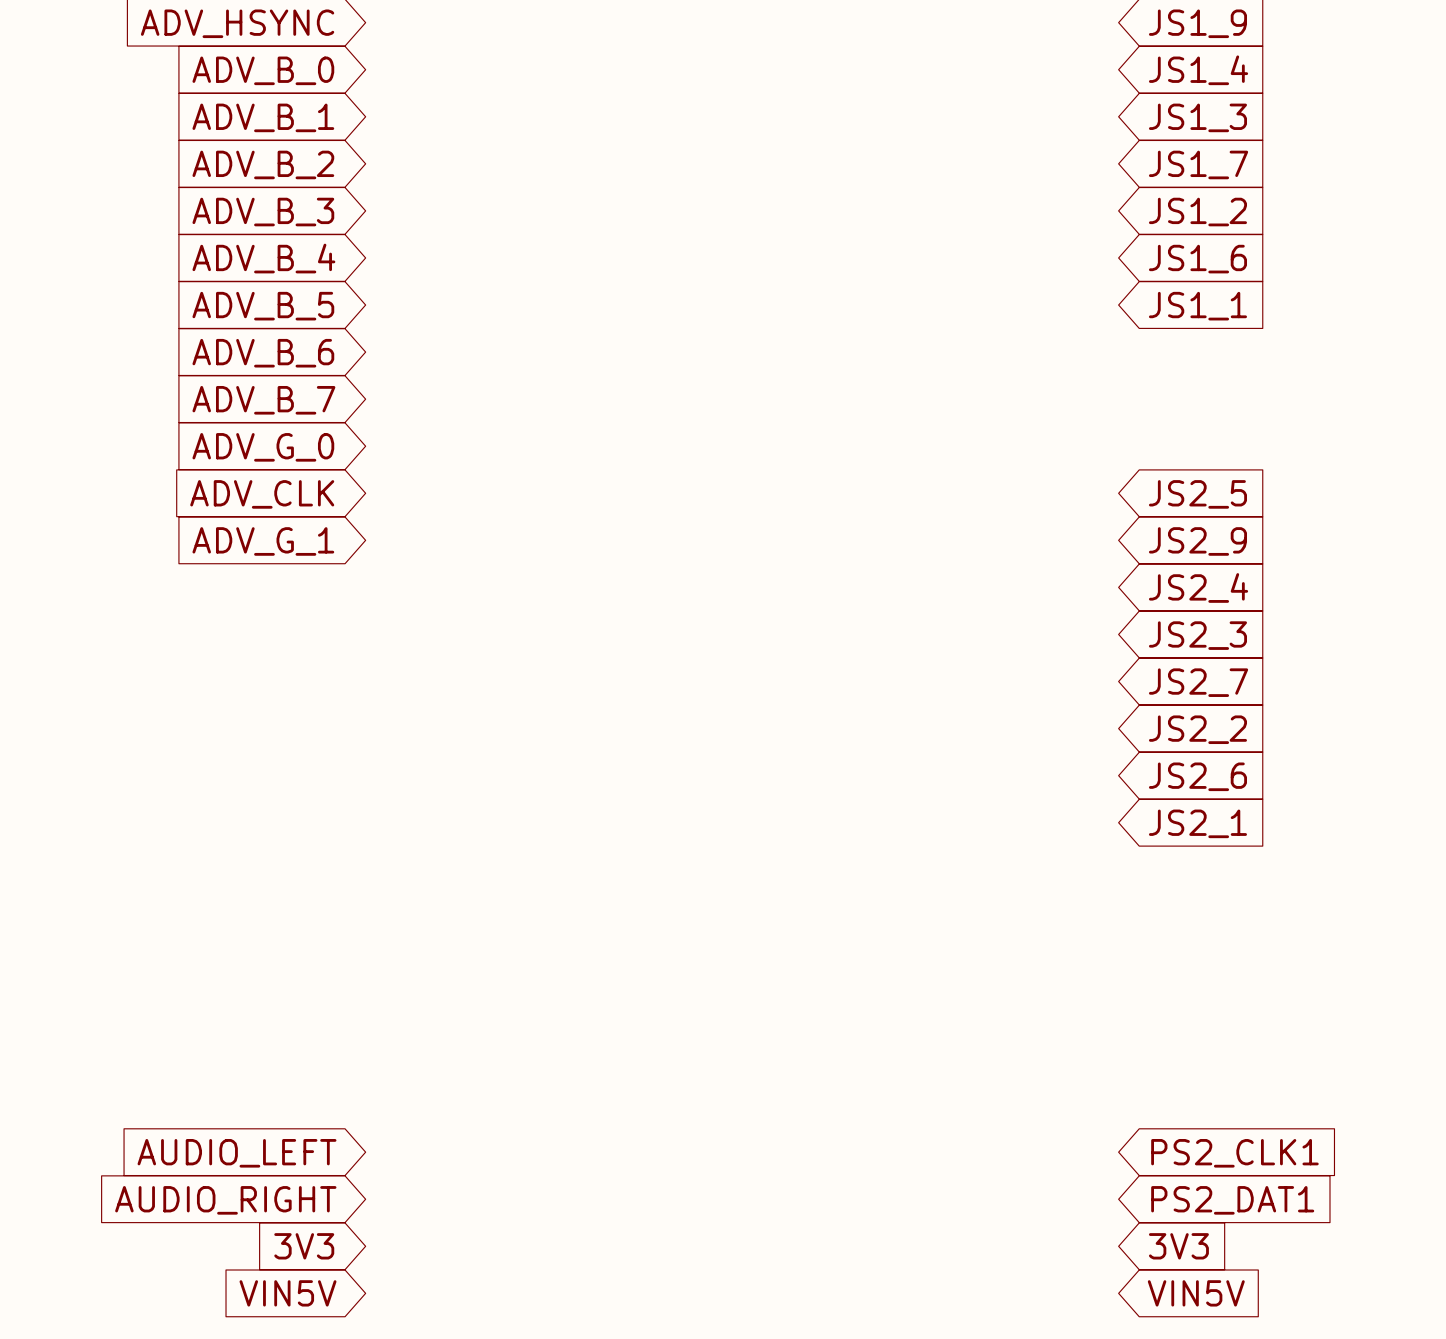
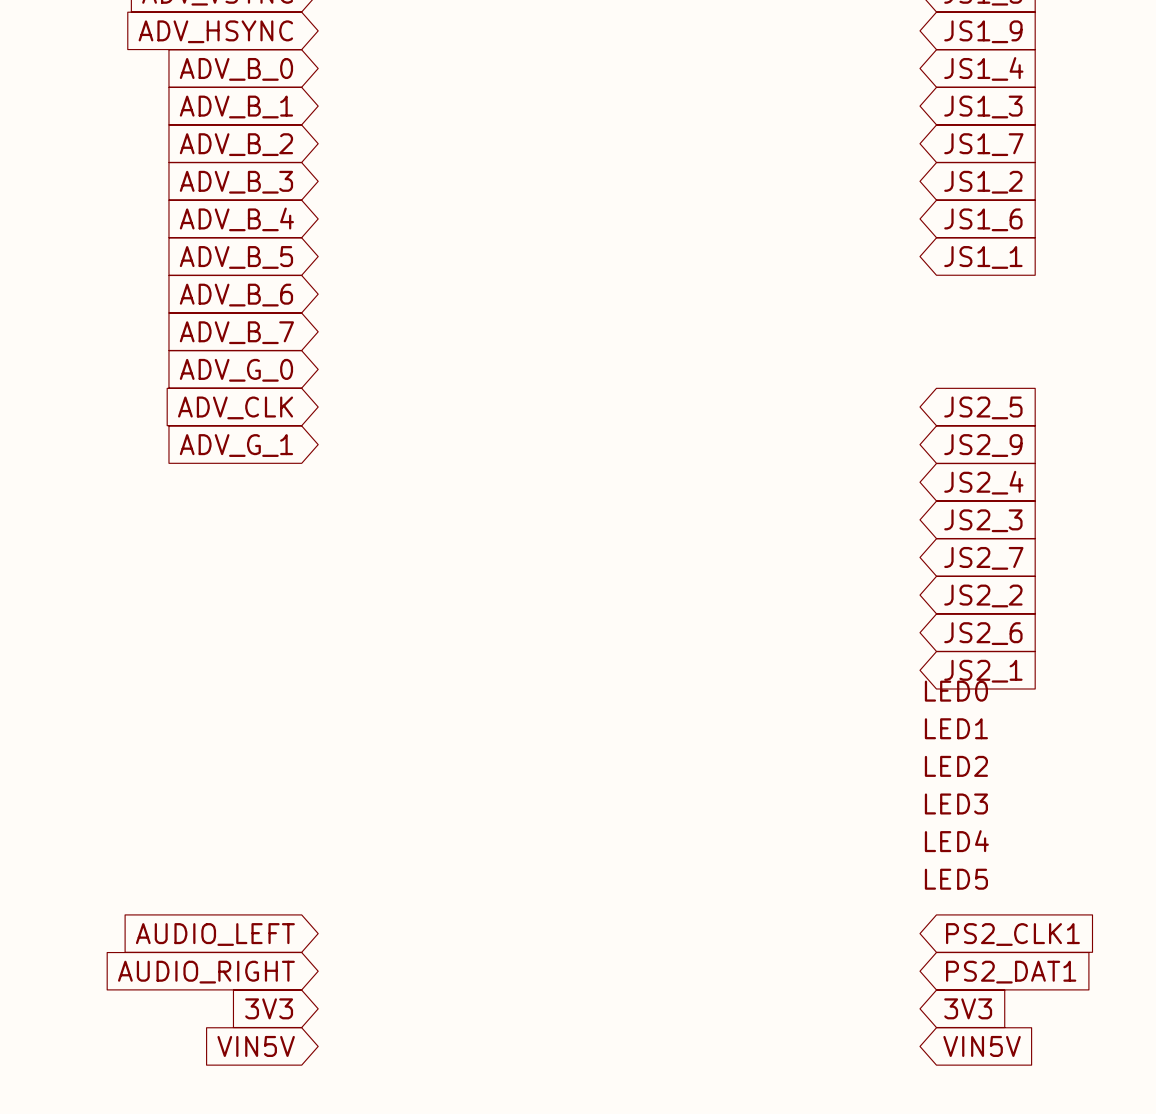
label: none -> LED0 (956, 691)
label: none -> LED1 (956, 728)
label: none -> LED2 (956, 766)
label: none -> LED3 (956, 803)
label: none -> LED4 (956, 841)
label: none -> LED5 (956, 879)

